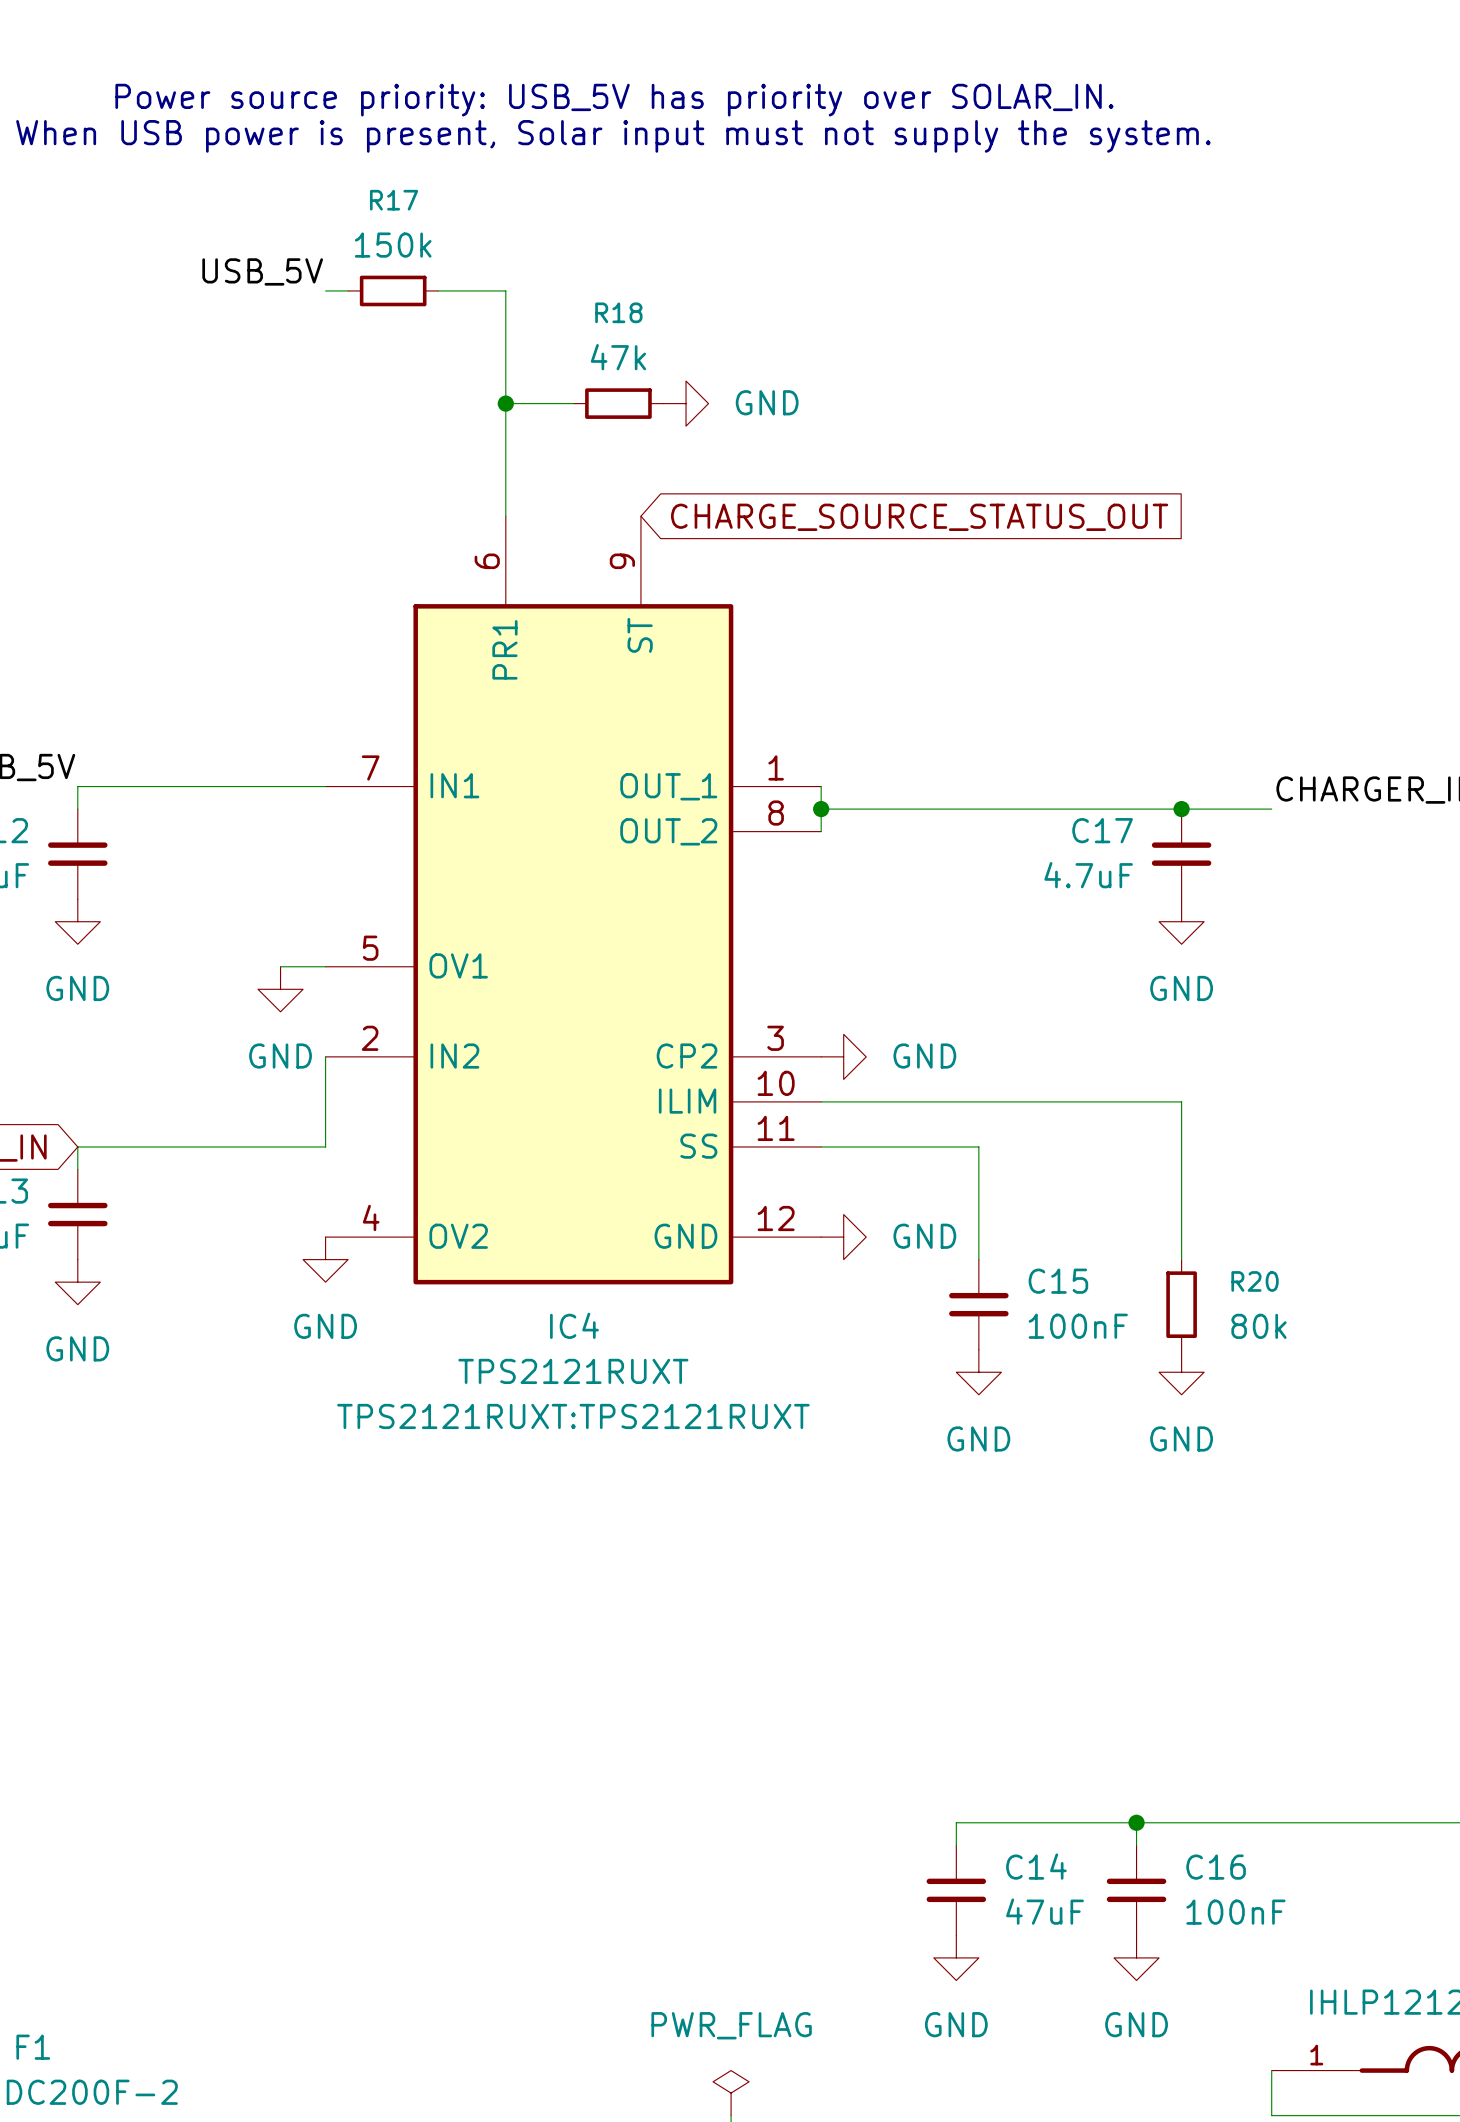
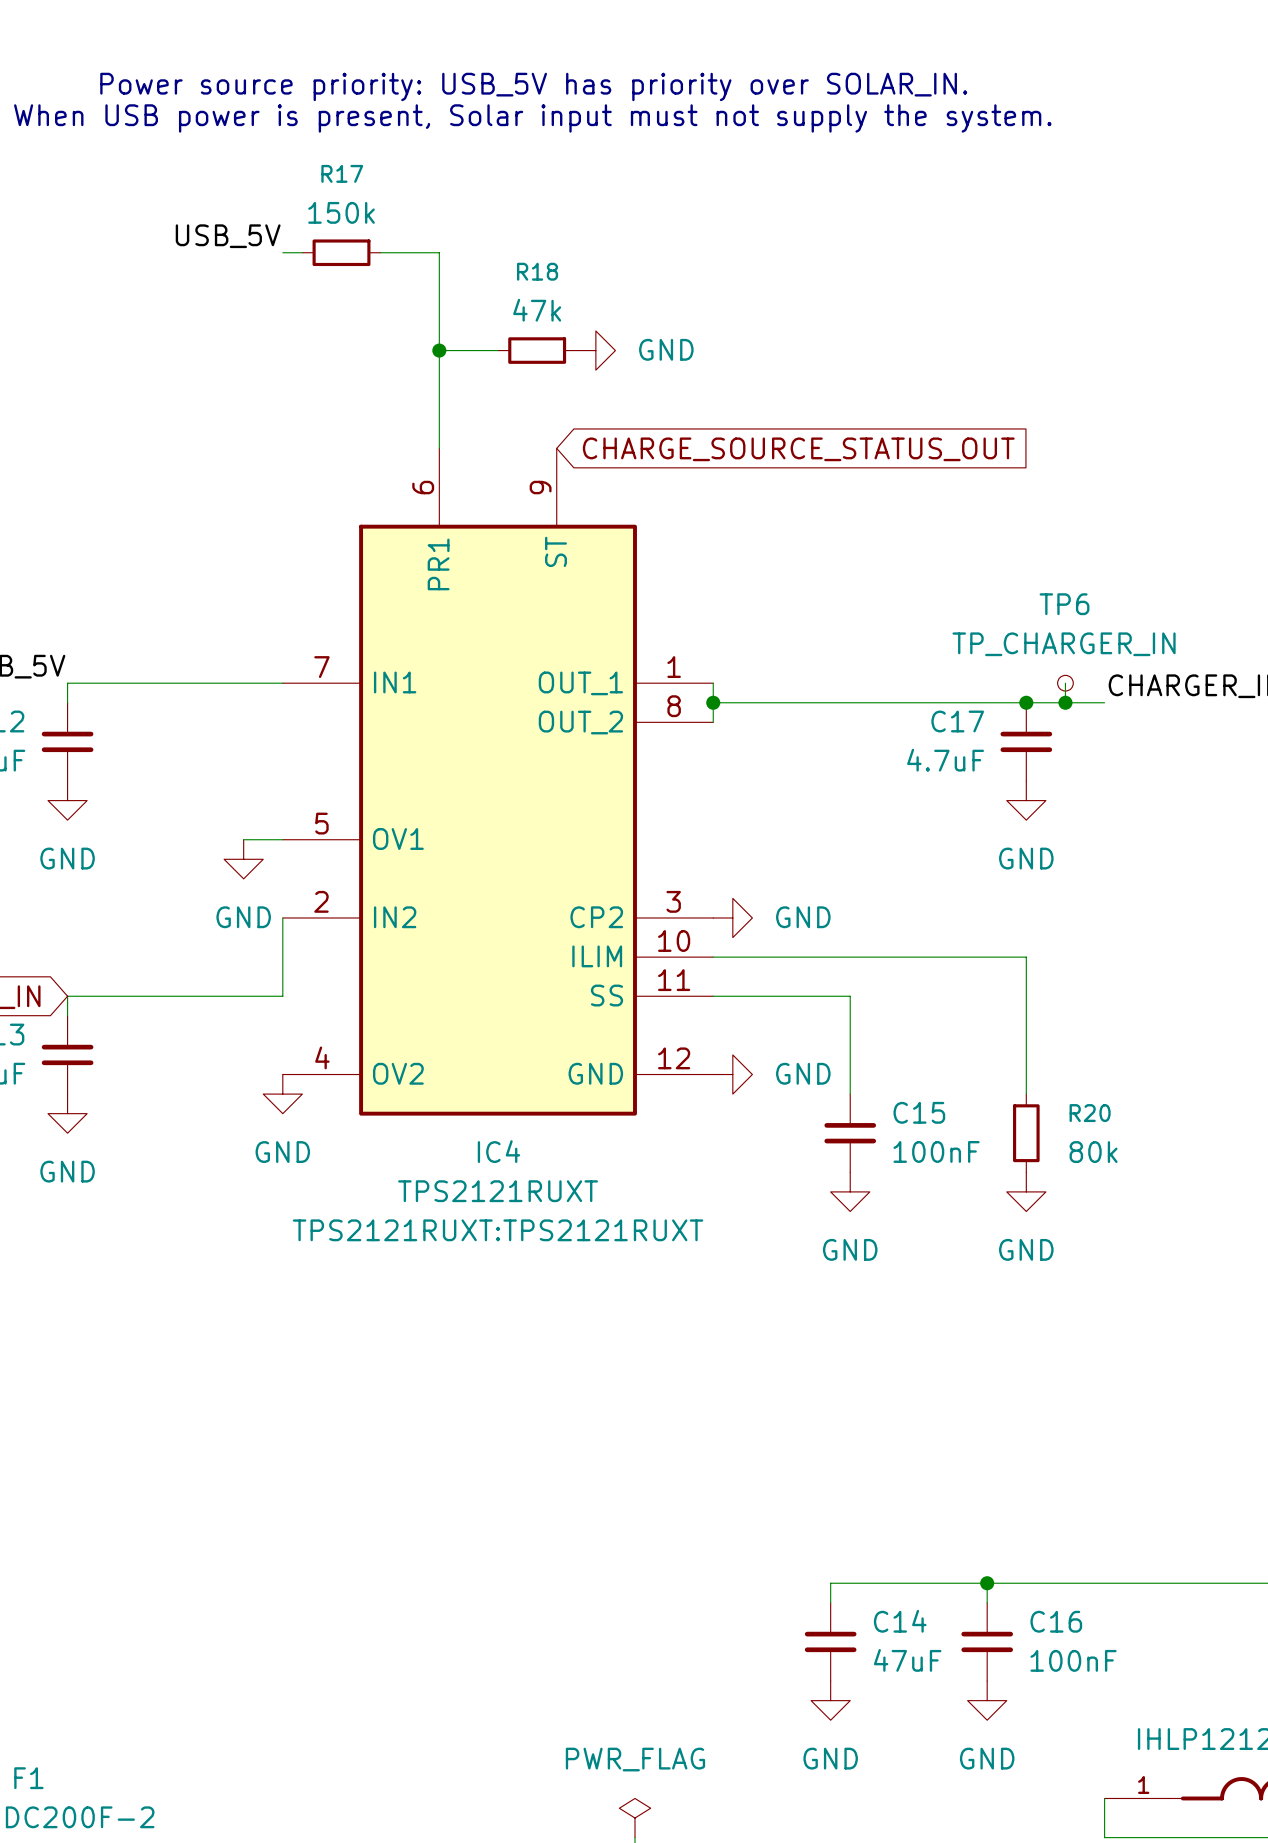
wire: none -> (1065, 683) (1065, 702)
TP6: none -> TP_CHARGER_IN (1065, 683)
junction: none -> (1065, 702)

